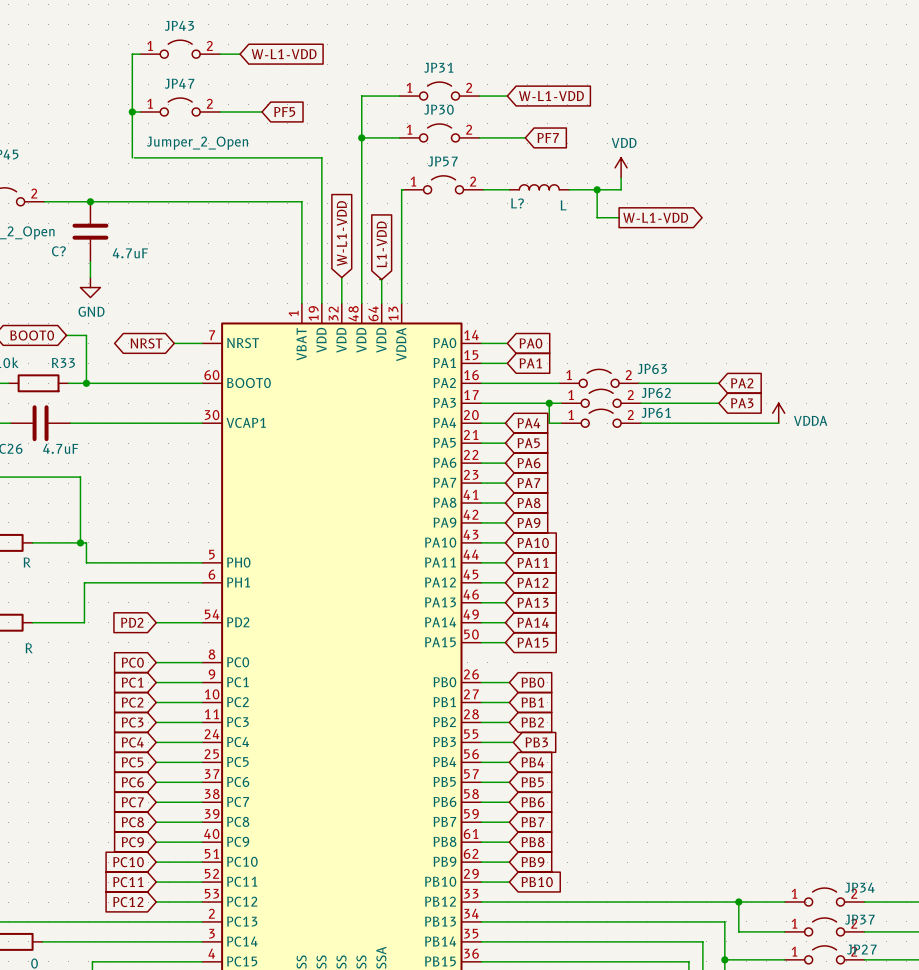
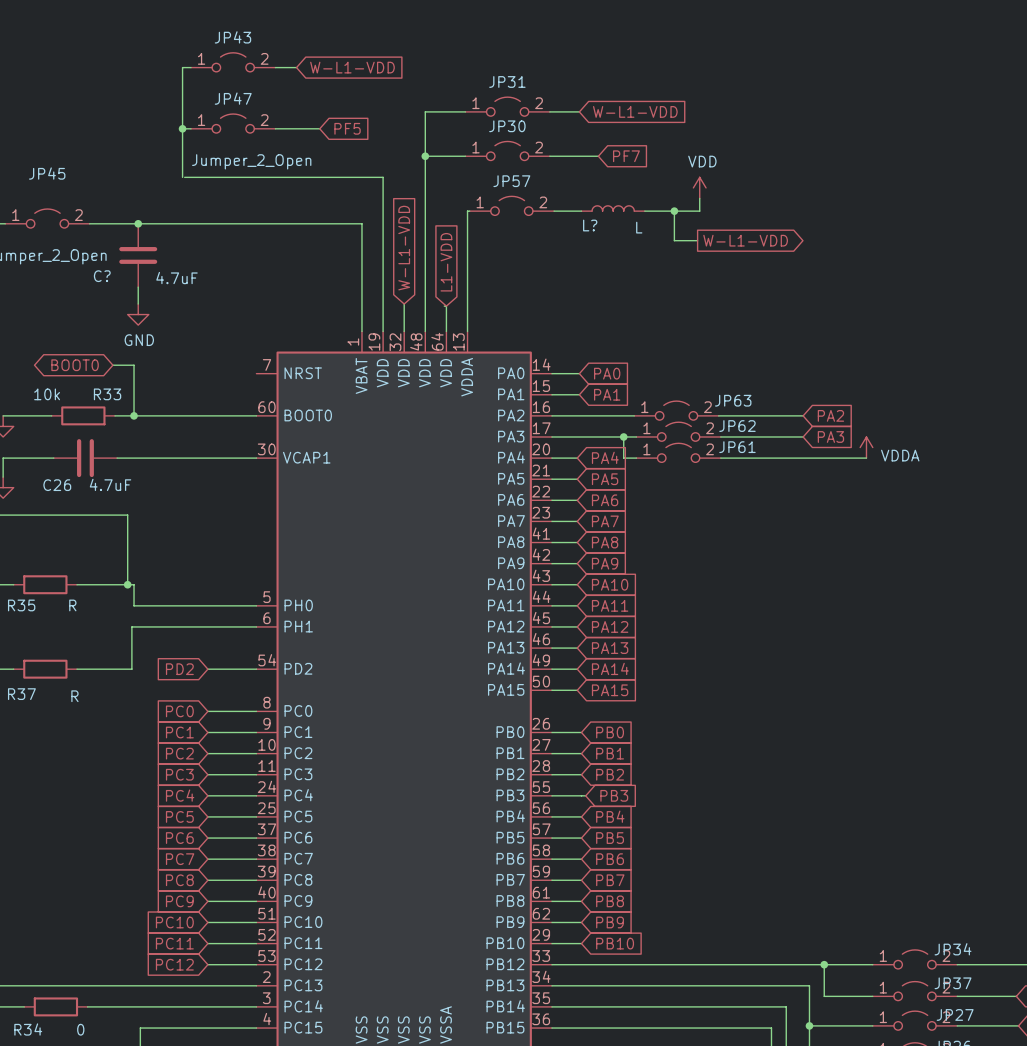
global label: NRST (146, 343) -> none
wire: (174, 343) (202, 343) -> none

